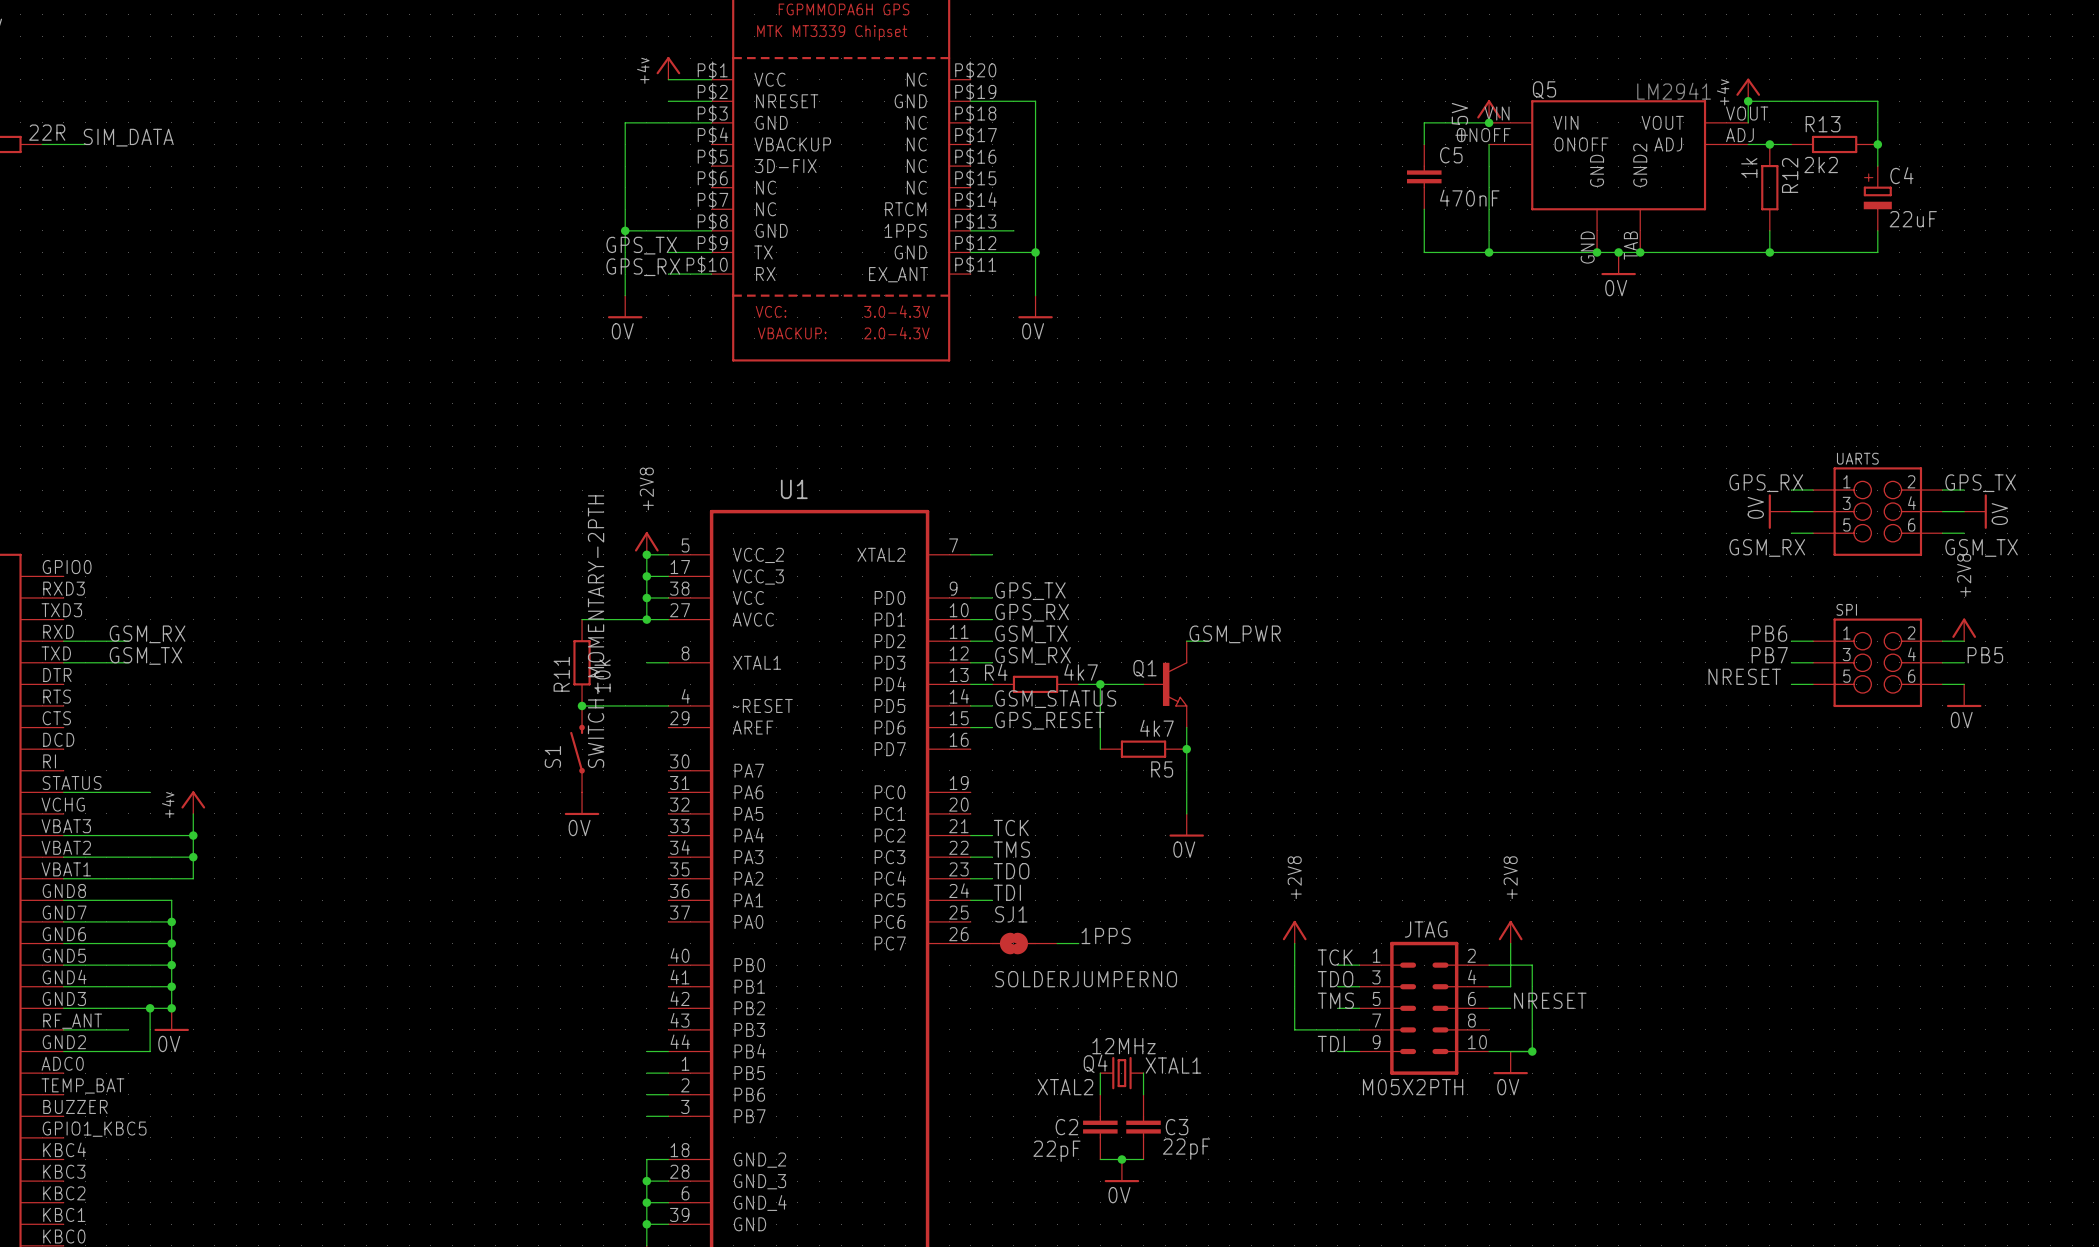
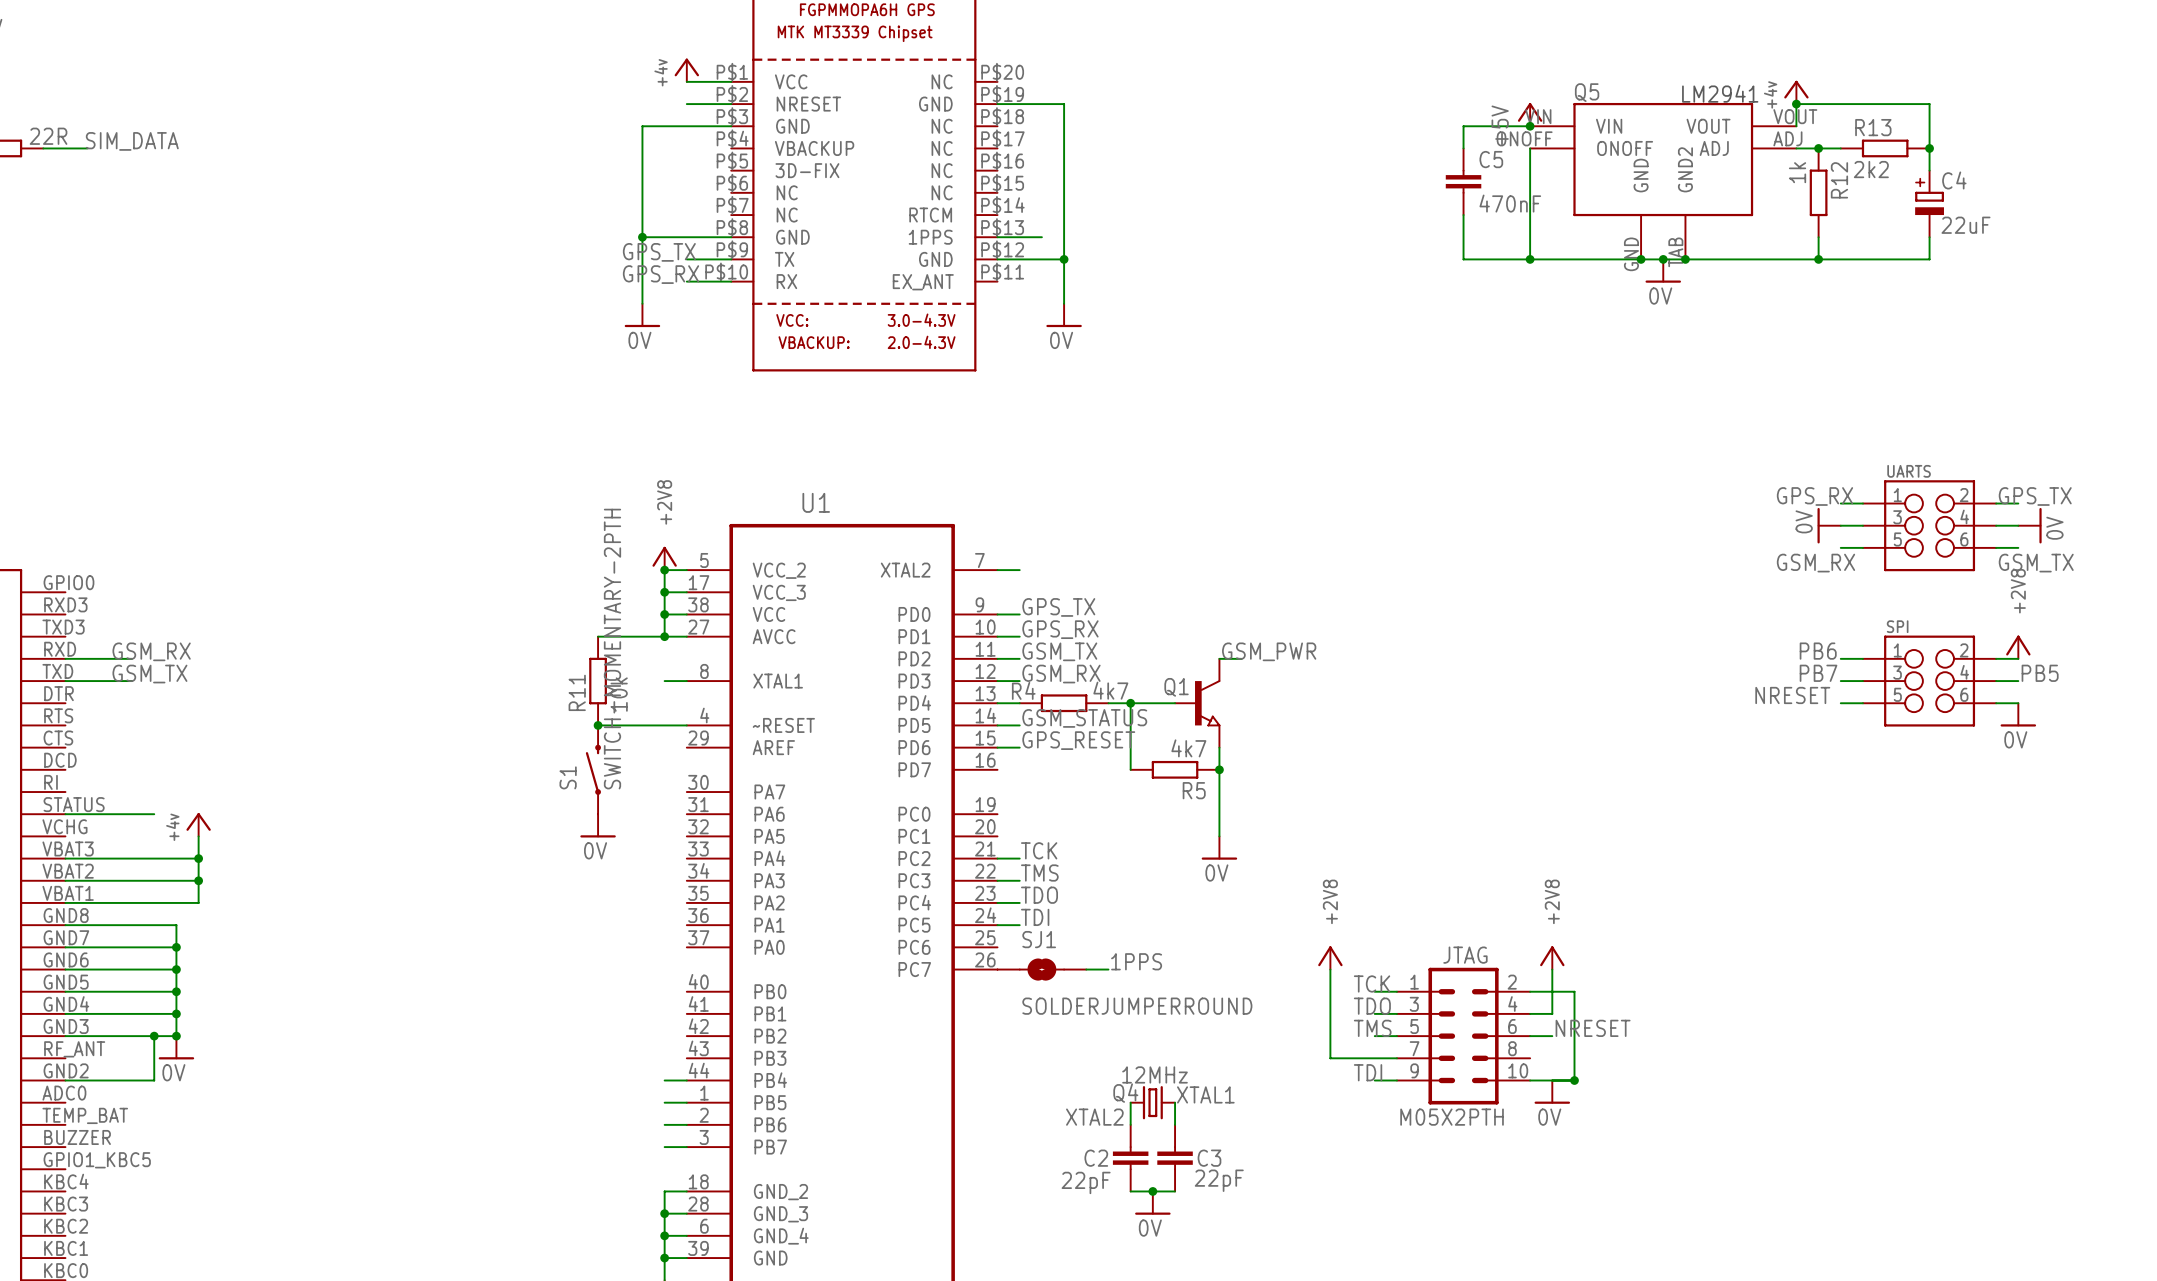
SJ1 value: SOLDERJUMPERNO (1086, 979) -> SOLDERJUMPERROUND (1137, 1006)
wire: (63, 1029) (128, 1029) -> none

